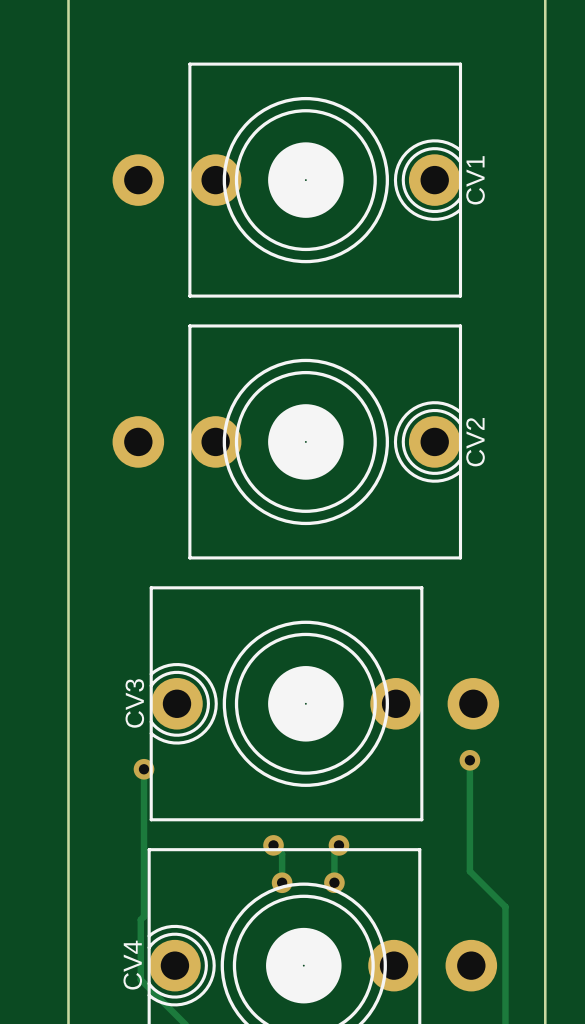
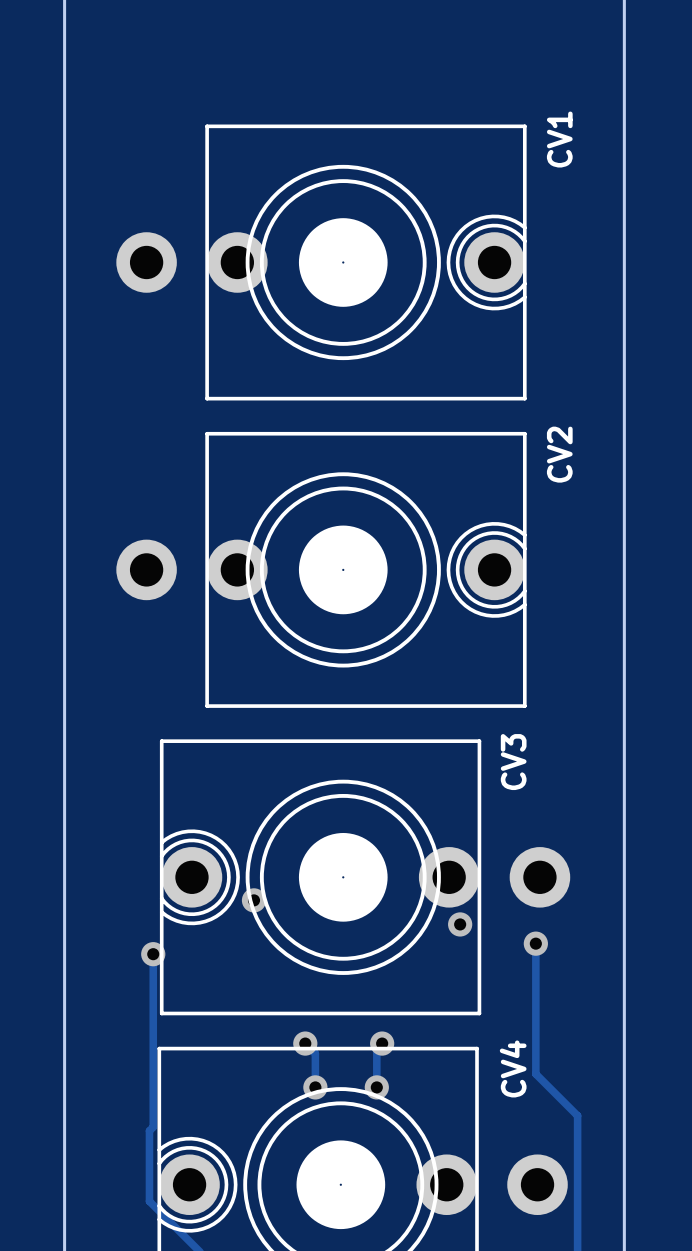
part value position: CV1 (475, 180) -> CV1 (559, 139)
part value position: CV2 (475, 442) -> CV2 (559, 454)
part value position: CV3 (134, 703) -> CV3 (513, 762)
via: none -> (253, 900)
via: none -> (460, 924)
part value position: CV4 (132, 965) -> CV4 (513, 1068)

